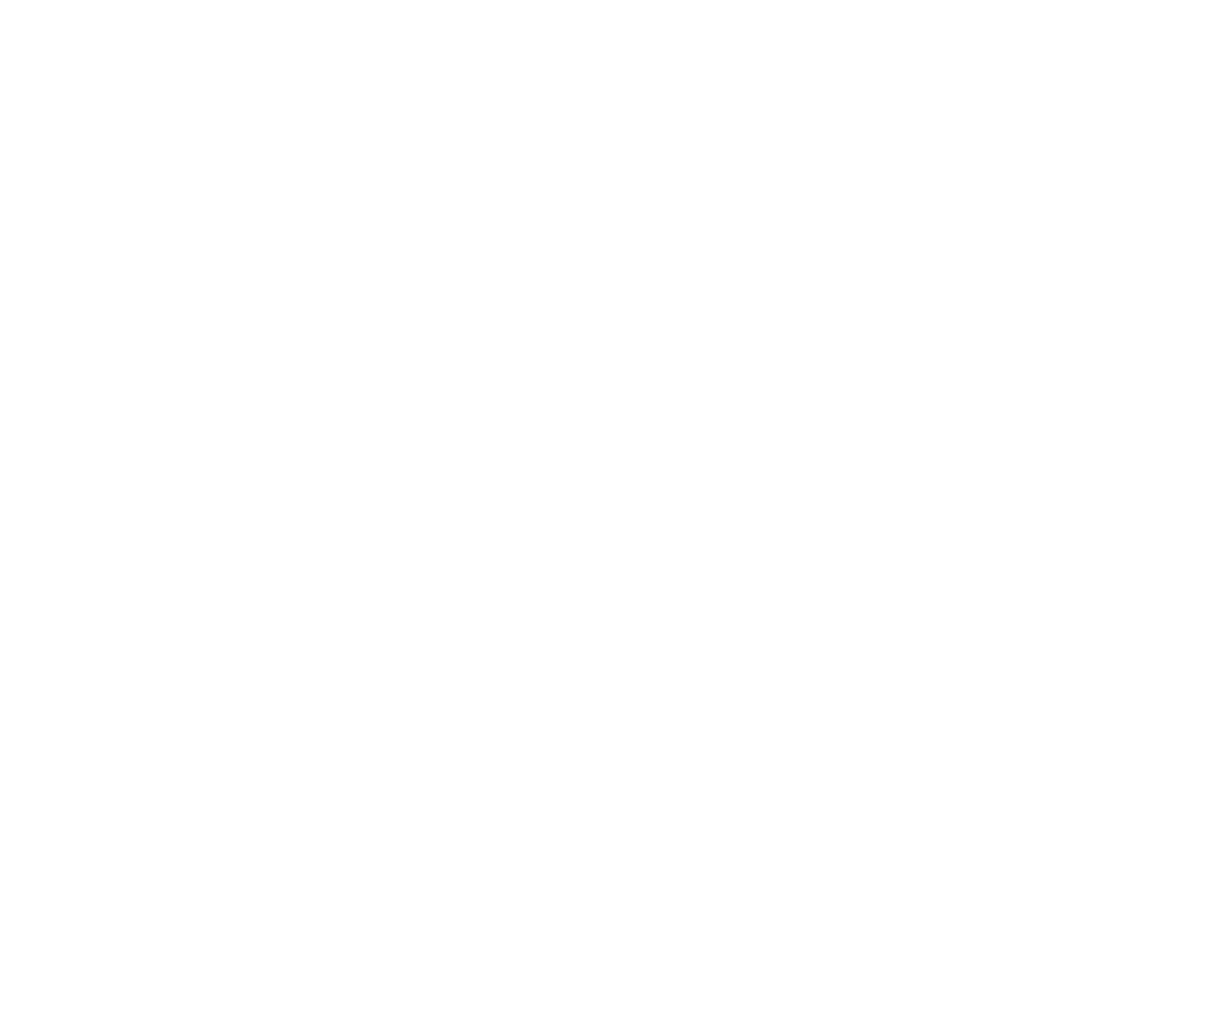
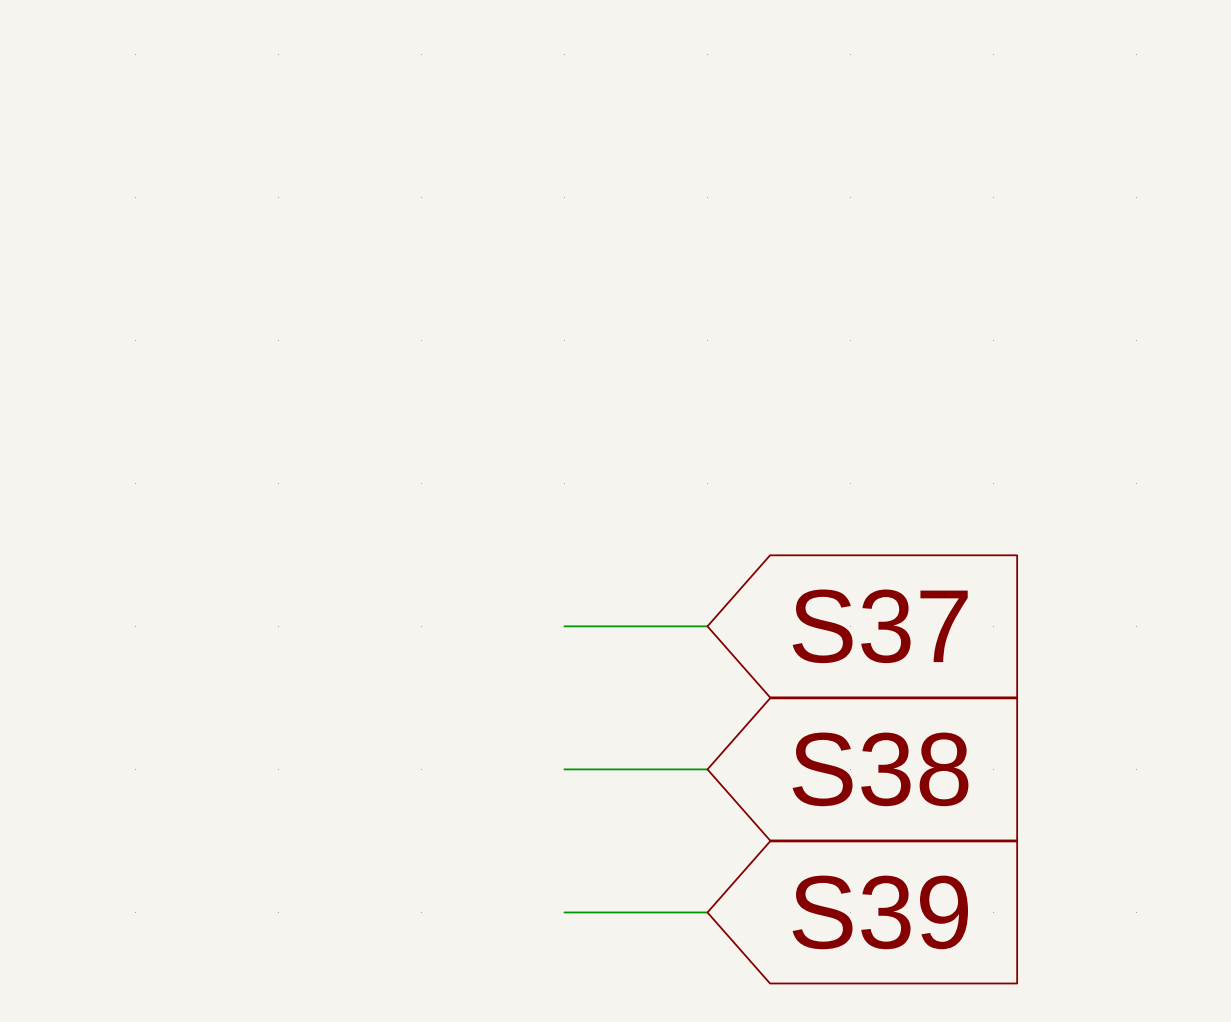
wire: none -> (564, 626) (707, 626)
global label: none -> S37 (880, 626)
wire: none -> (564, 769) (707, 769)
global label: none -> S38 (880, 769)
wire: none -> (564, 912) (707, 912)
global label: none -> S39 (880, 912)

